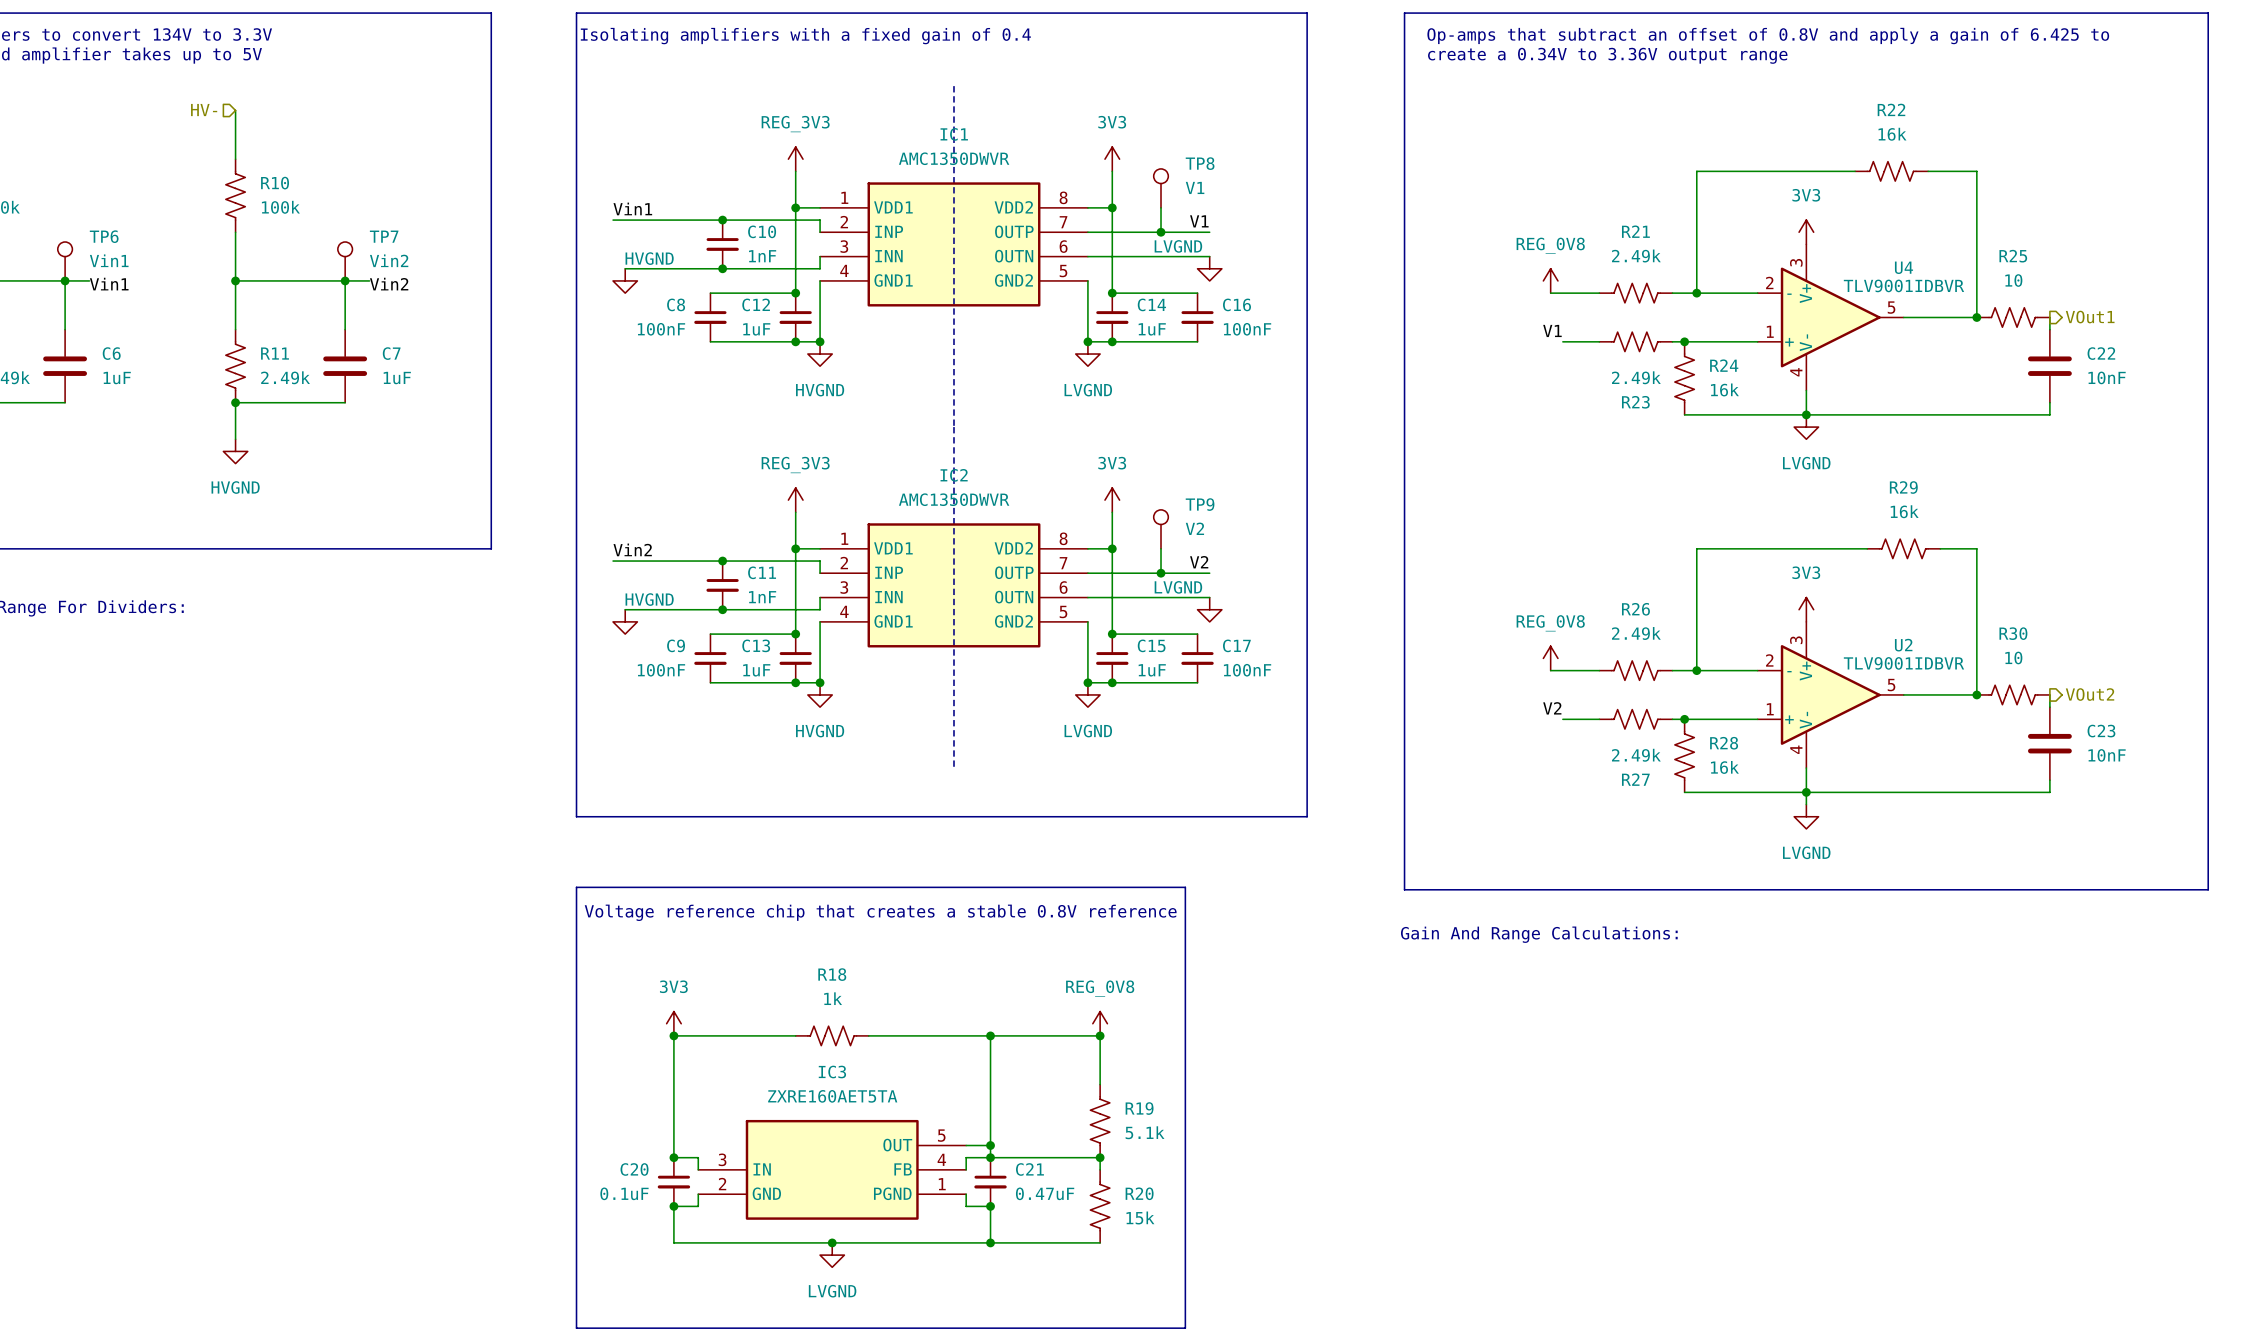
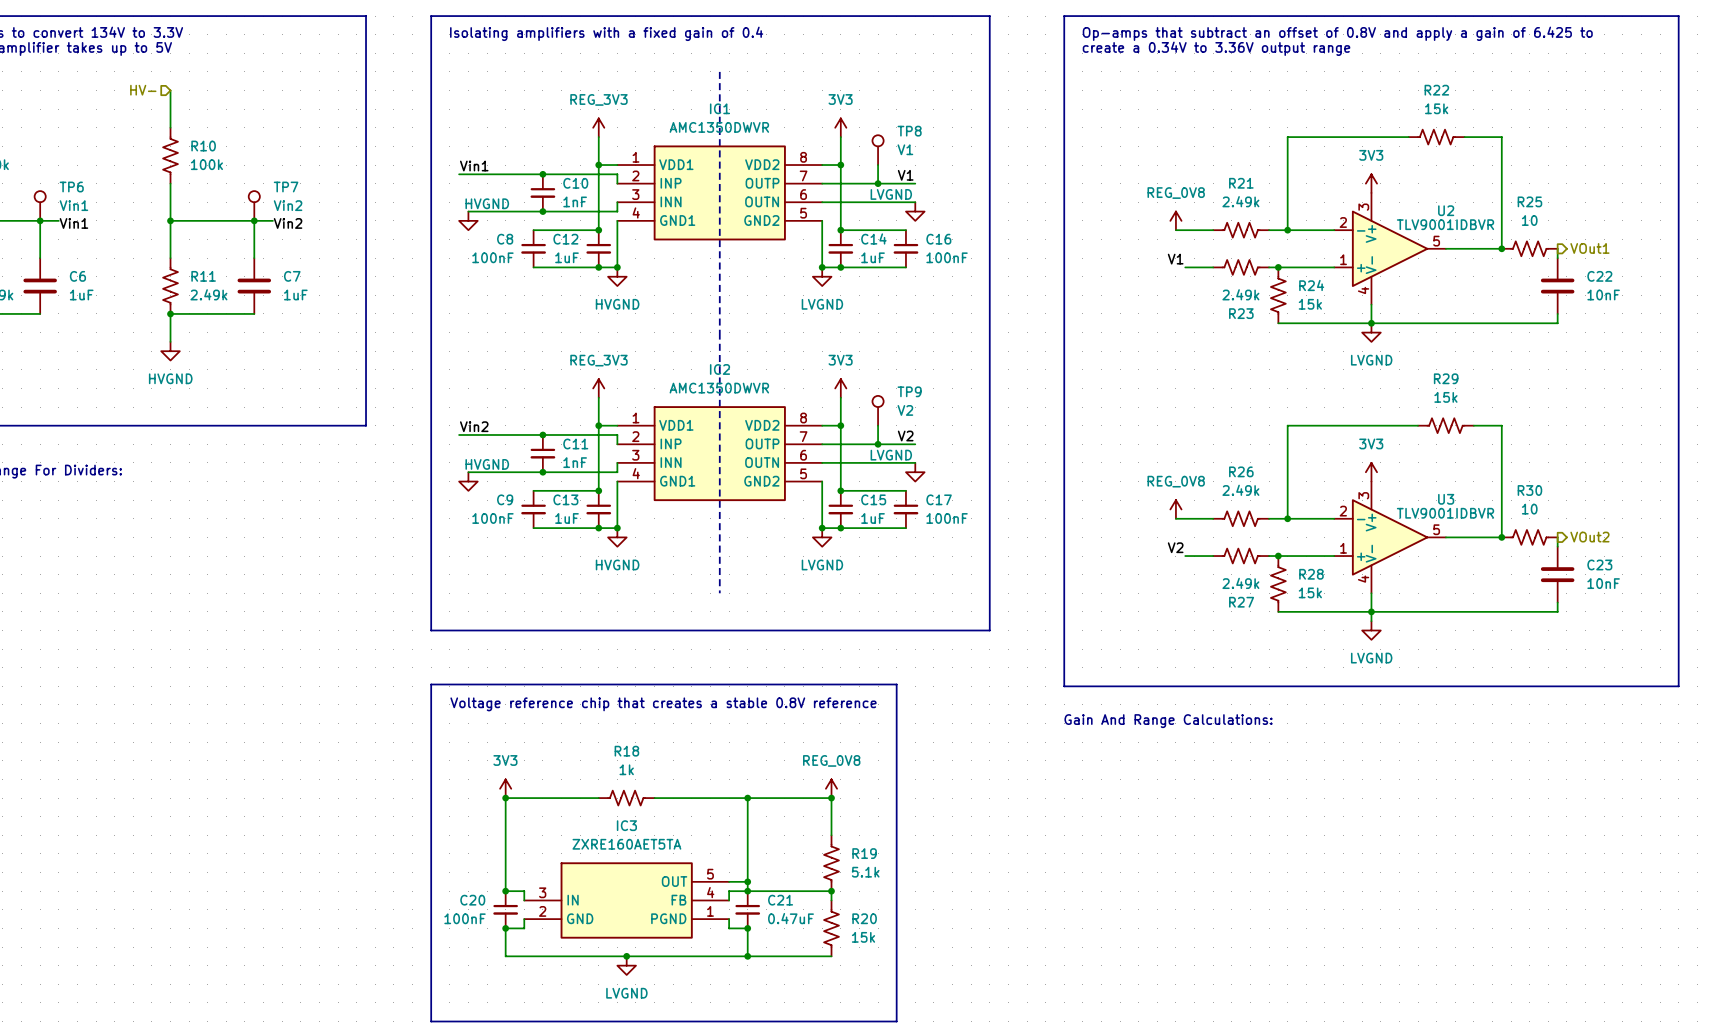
R22 value: 16k (1892, 134) -> 15k (1436, 108)
U4 name: U4 (1903, 267) -> U2 (1446, 210)
R24 value: 16k (1724, 389) -> 15k (1310, 304)
R29 value: 16k (1904, 511) -> 15k (1445, 397)
U2 name: U2 (1903, 645) -> U3 (1446, 499)
R28 value: 16k (1724, 767) -> 15k (1310, 592)
C20 value: 0.1uF (624, 1193) -> 100nF (465, 918)

